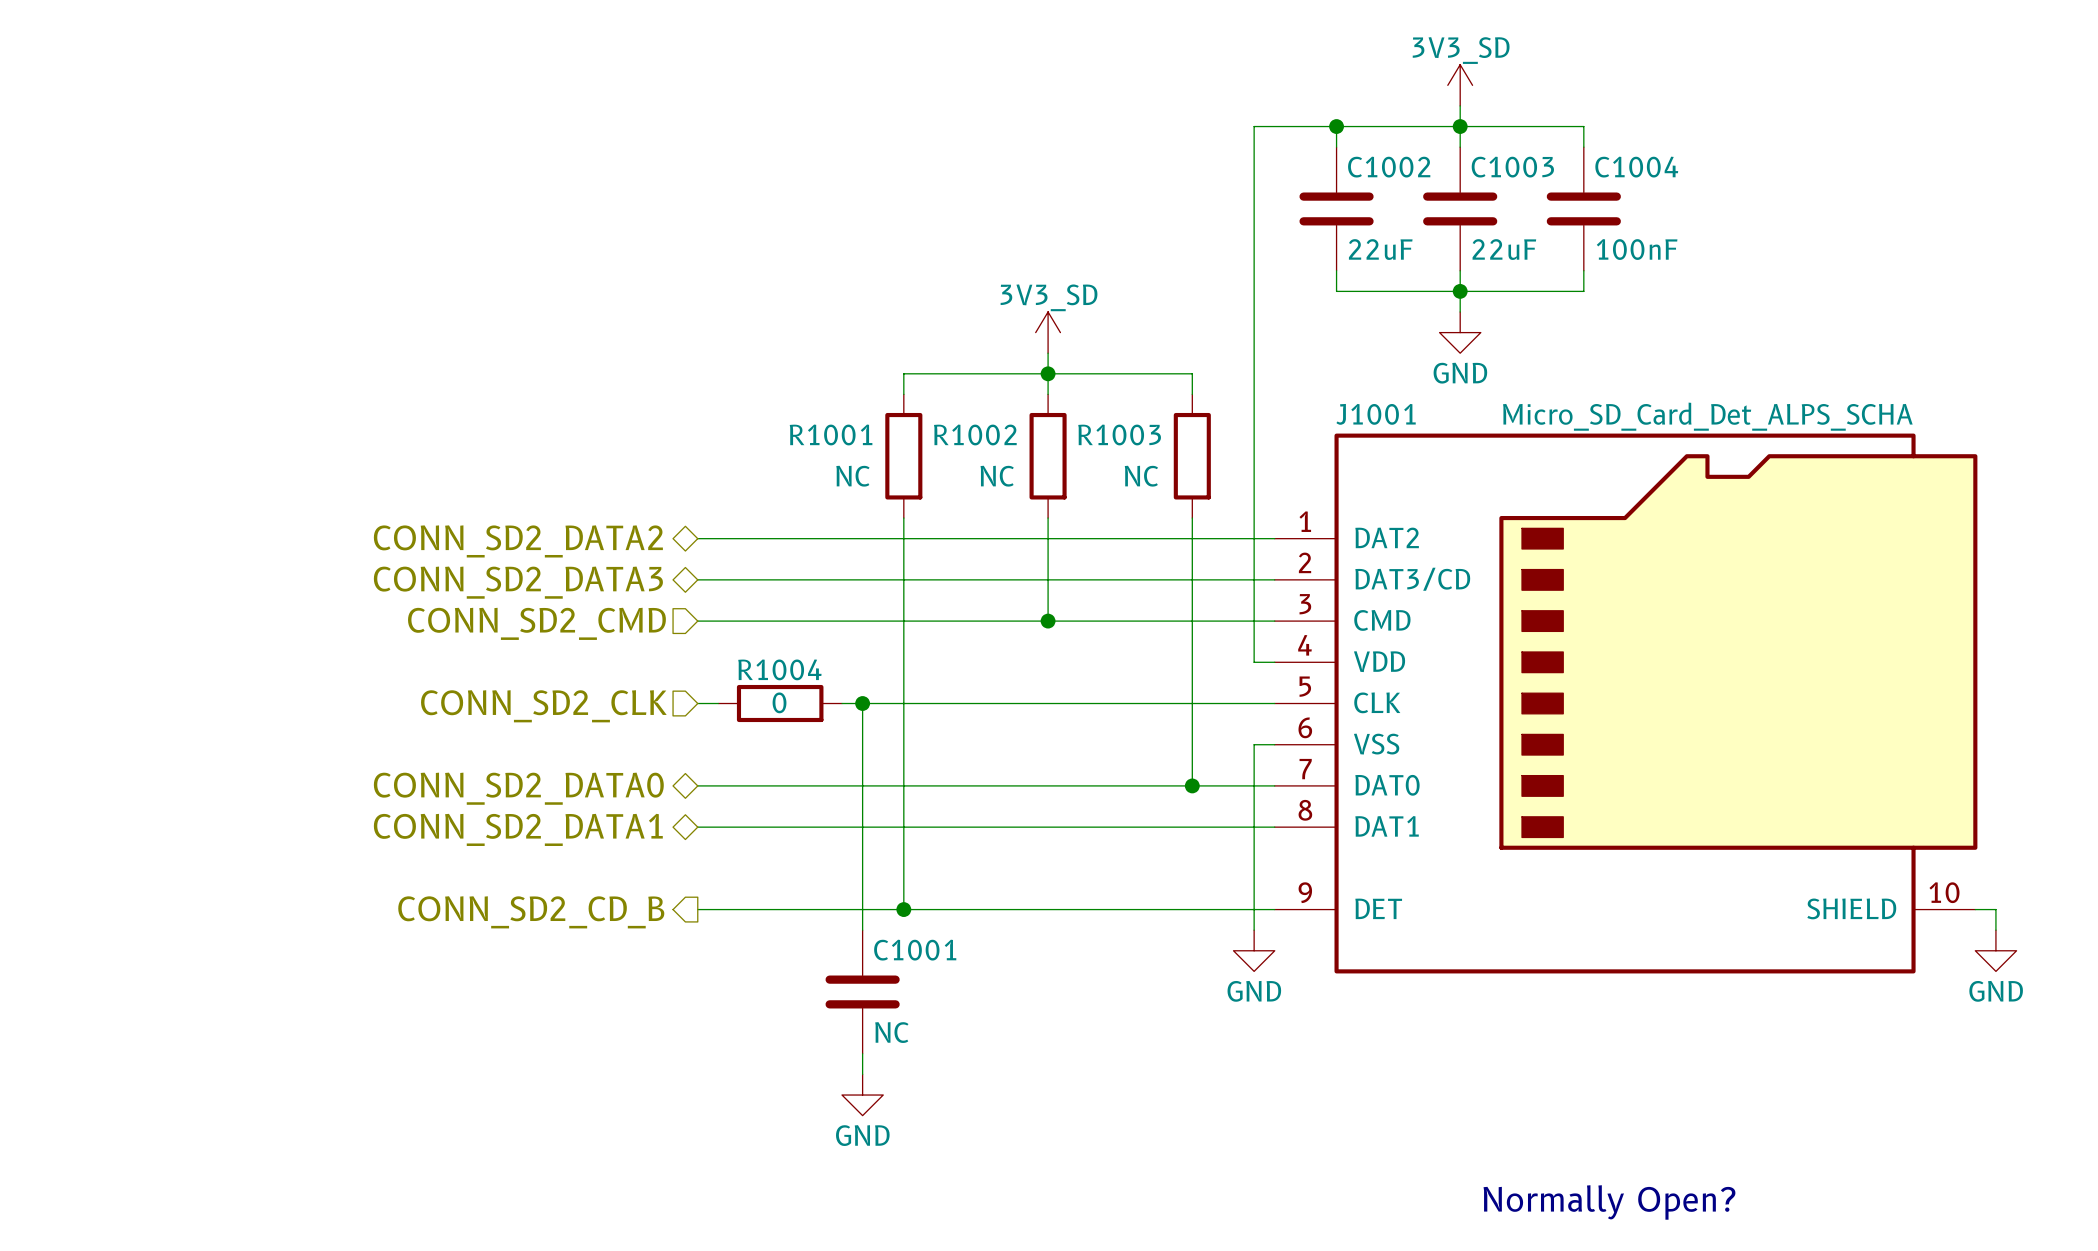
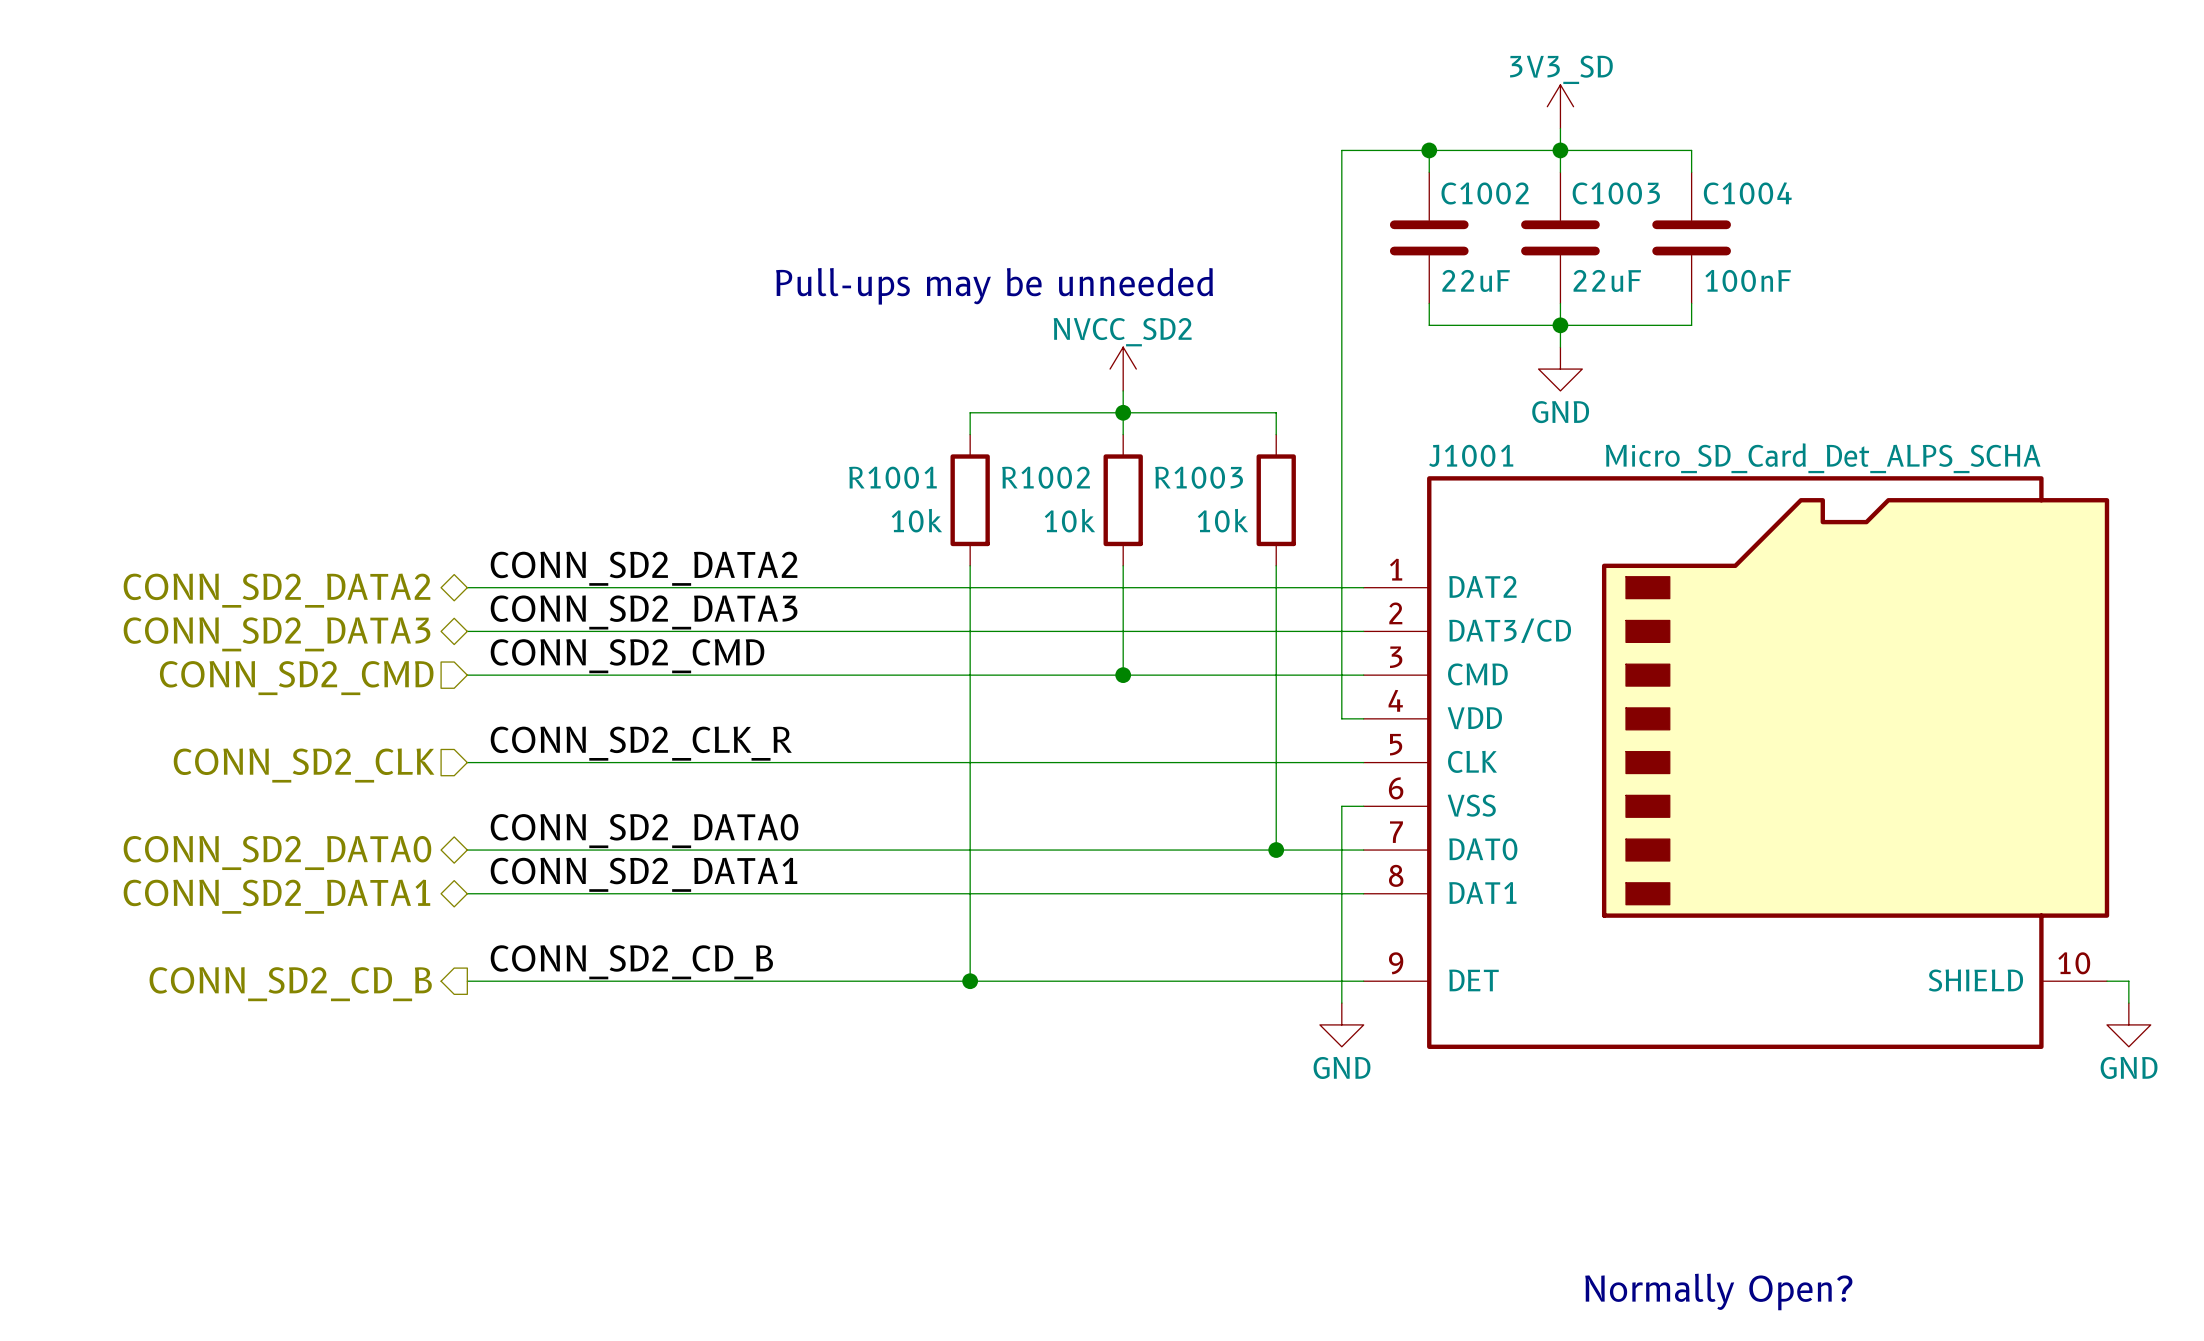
text: none -> Pull-ups may be unneeded (994, 286)
power symbol: 3V3_SD (1048, 332) -> NVCC_SD2 (1123, 369)
R1001 value: NC (852, 476) -> 10k (916, 520)
R1002 value: NC (997, 476) -> 10k (1069, 520)
R1003 value: NC (1141, 476) -> 10k (1222, 520)
label: none -> CONN_SD2_DATA2 (644, 568)
wire: none -> (467, 587) (751, 587)
hierarchical label position: CONN_SD2_DATA2 (518, 541) -> CONN_SD2_DATA2 (276, 590)
label: none -> CONN_SD2_DATA3 (644, 612)
wire: none -> (467, 631) (751, 631)
hierarchical label position: CONN_SD2_DATA3 (518, 582) -> CONN_SD2_DATA3 (277, 634)
label: none -> CONN_SD2_CMD (627, 656)
wire: none -> (467, 675) (751, 675)
hierarchical label position: CONN_SD2_CMD (536, 623) -> CONN_SD2_CMD (296, 678)
label: none -> CONN_SD2_CLK_R (641, 743)
wire: none -> (467, 762) (751, 762)
wire: none -> (773, 762) (904, 762)
R1004: 0 (780, 703) -> none
wire: (862, 703) (862, 930) -> none
junction: (862, 703) -> none
hierarchical label position: CONN_SD2_CLK (543, 706) -> CONN_SD2_CLK (304, 765)
label: none -> CONN_SD2_DATA0 (644, 831)
wire: none -> (467, 850) (751, 850)
hierarchical label position: CONN_SD2_DATA0 (518, 788) -> CONN_SD2_DATA0 (277, 852)
label: none -> CONN_SD2_DATA1 (643, 874)
wire: none -> (467, 893) (751, 893)
hierarchical label position: CONN_SD2_DATA1 (518, 829) -> CONN_SD2_DATA1 (276, 896)
label: none -> CONN_SD2_CD_B (631, 962)
wire: none -> (467, 981) (751, 981)
hierarchical label position: CONN_SD2_CD_B (531, 912) -> CONN_SD2_CD_B (290, 984)
C1001: NC (862, 991) -> none
wire: (862, 1053) (862, 1074) -> none
power symbol: GND (862, 1095) -> none

